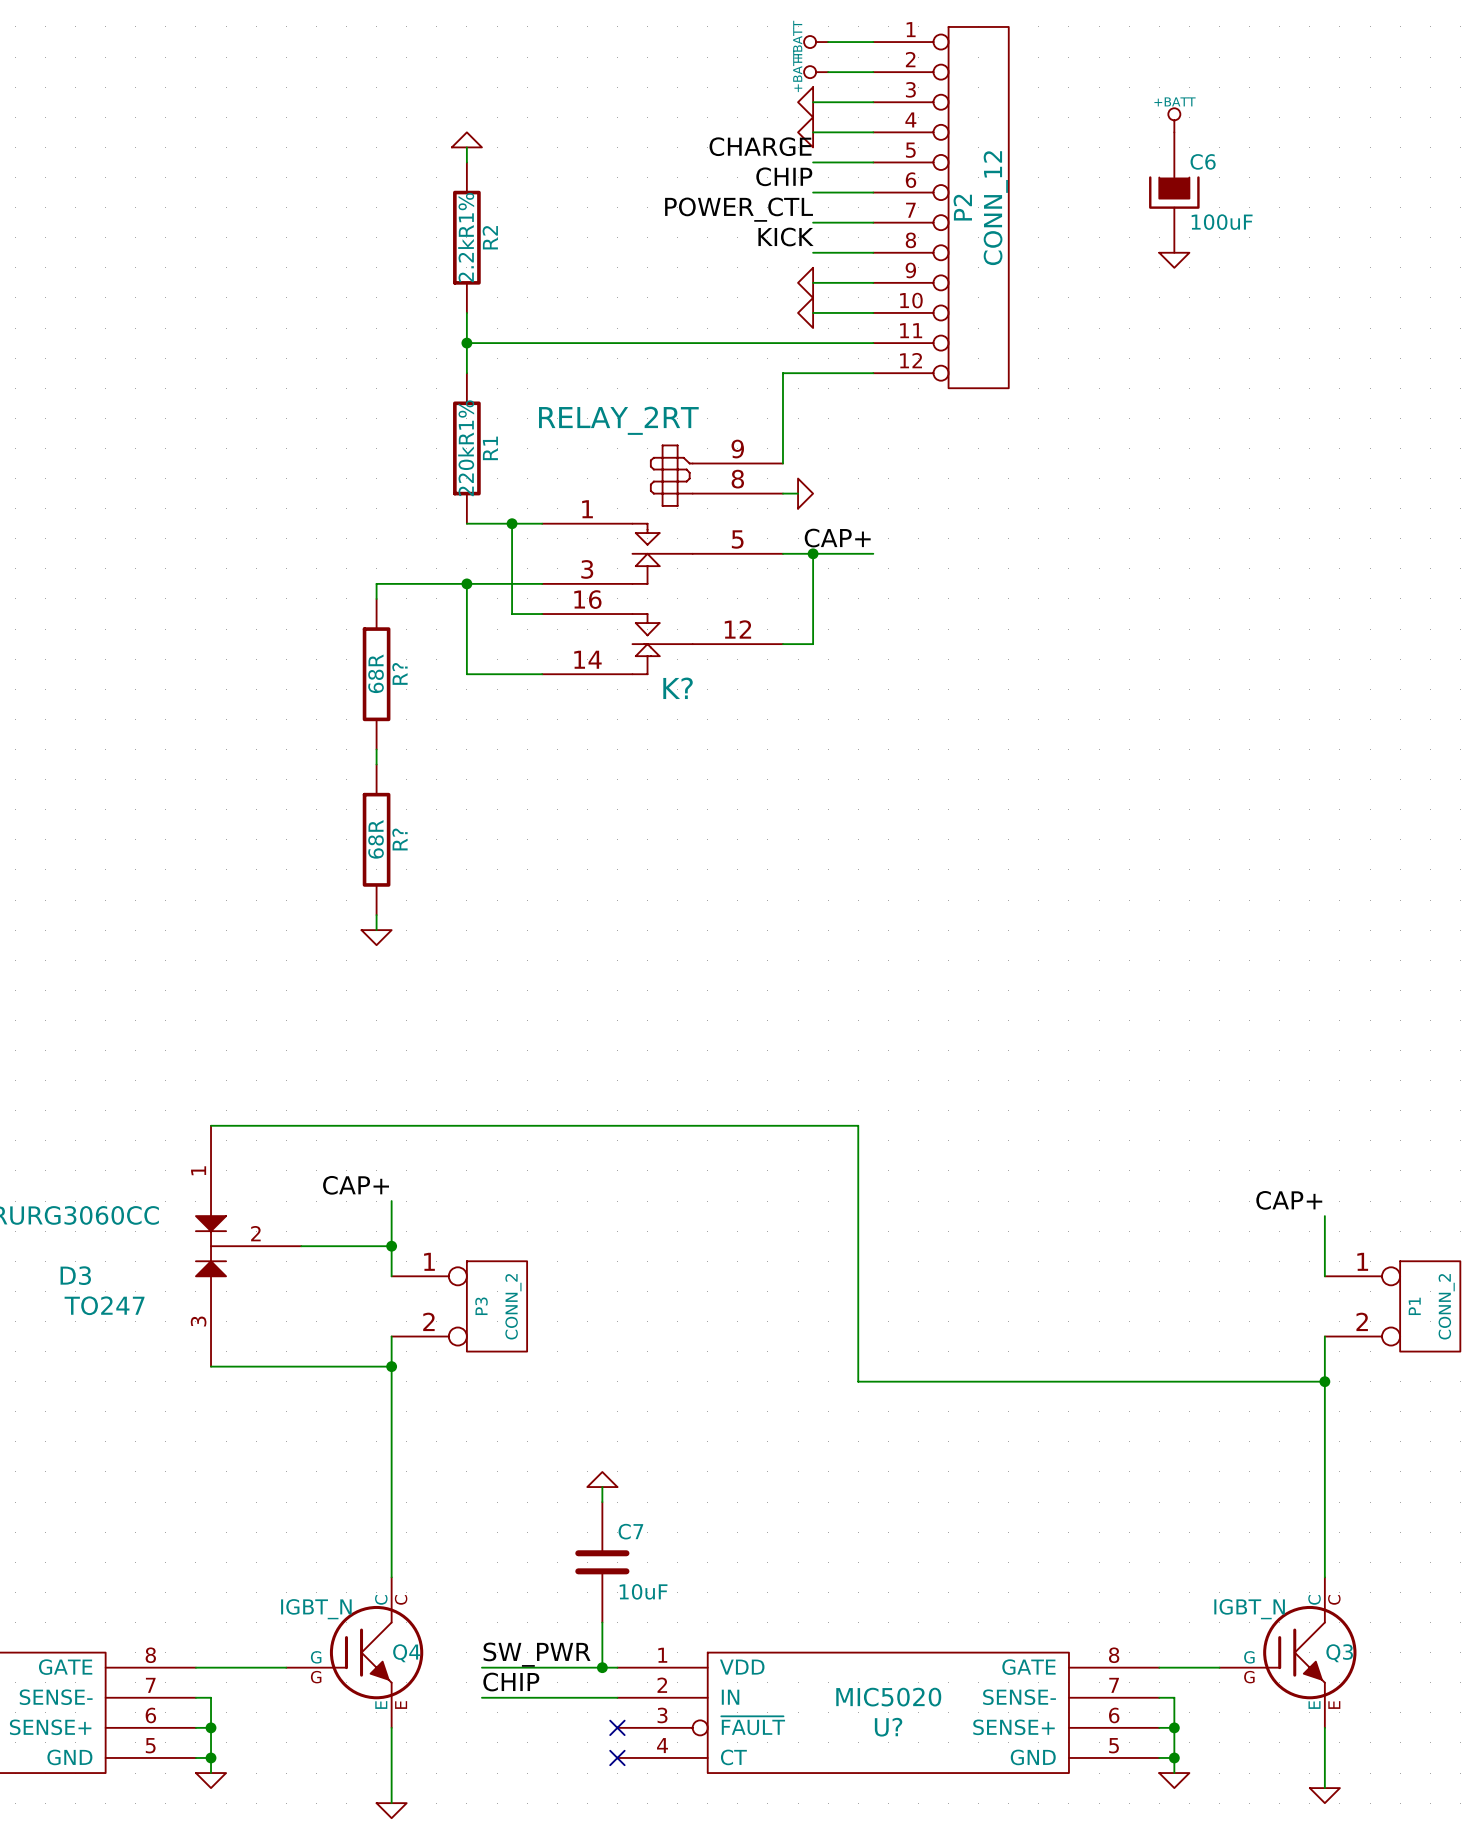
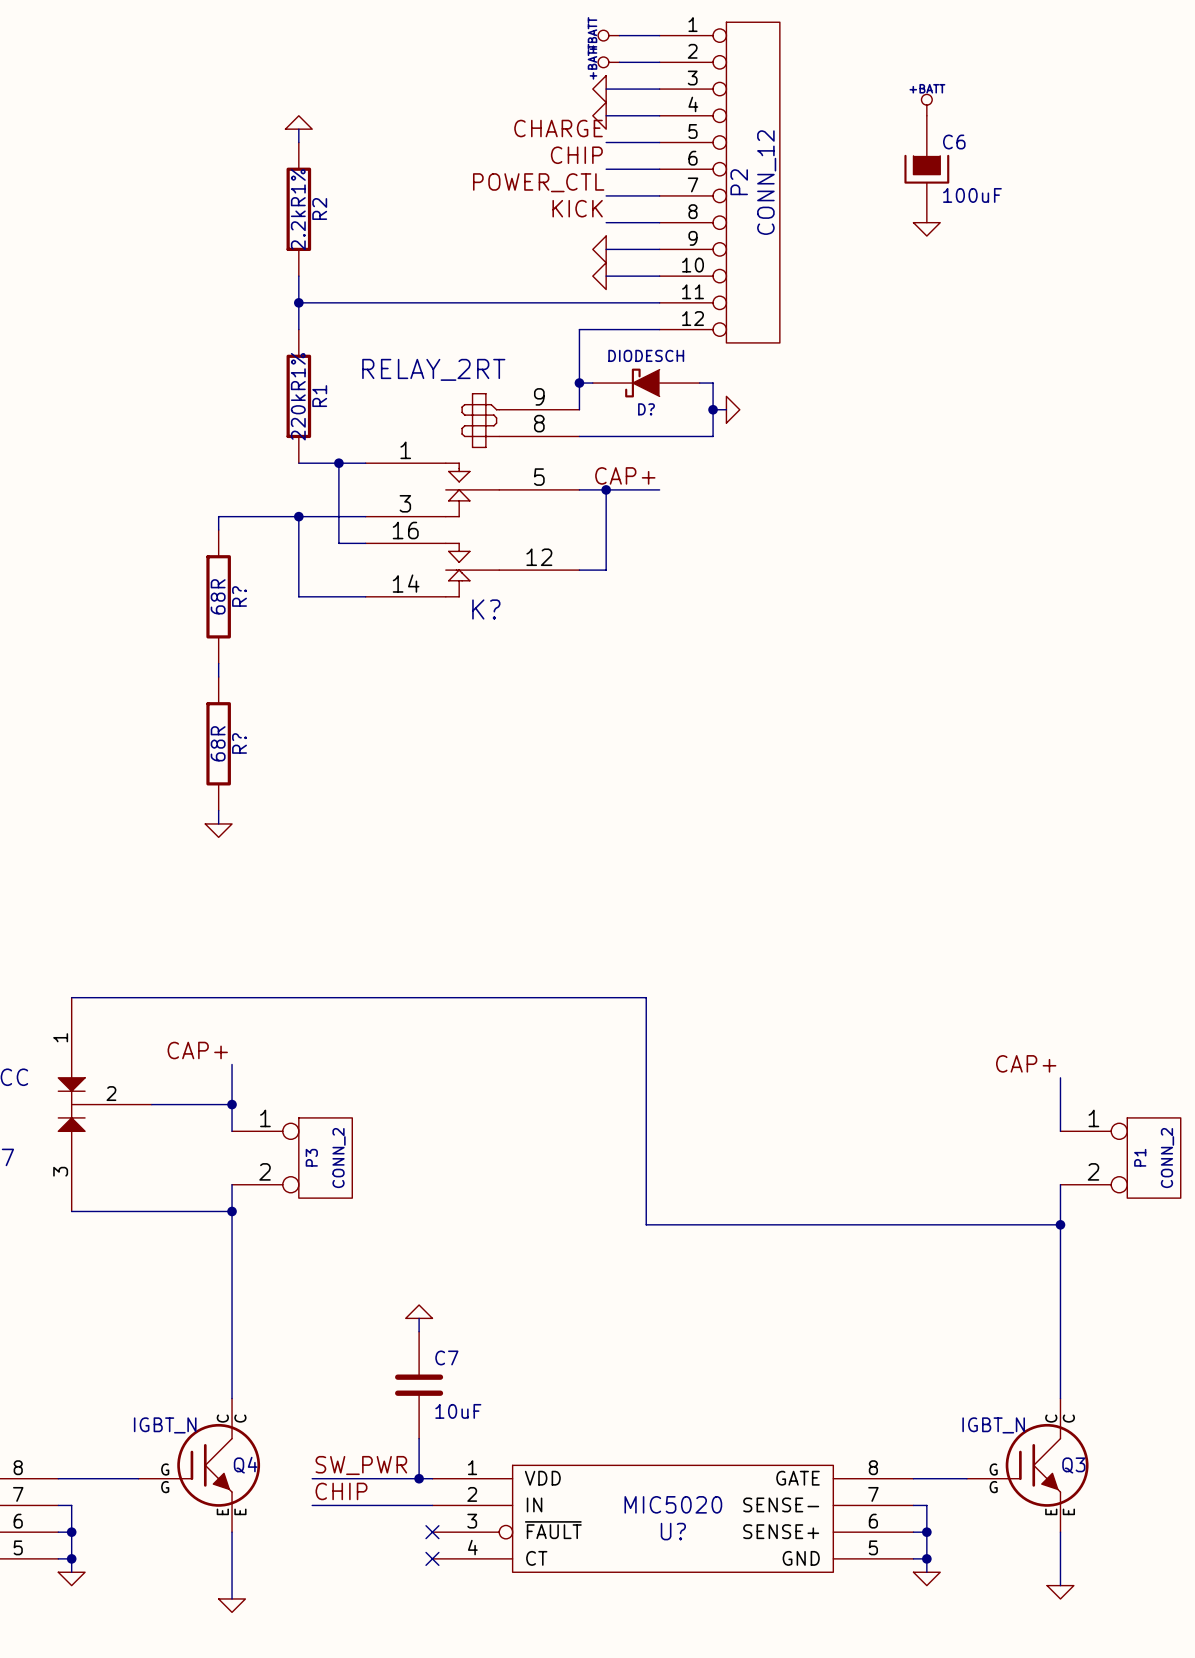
wire: none -> (579, 383) (592, 383)
junction: none -> (579, 383)
D?: none -> DIODESCH (646, 383)
wire: none -> (699, 383) (713, 383) (713, 436) (592, 436)
wire: none -> (713, 409) (726, 409)
junction: none -> (713, 409)
power symbol position: (805, 493) -> (733, 409)

